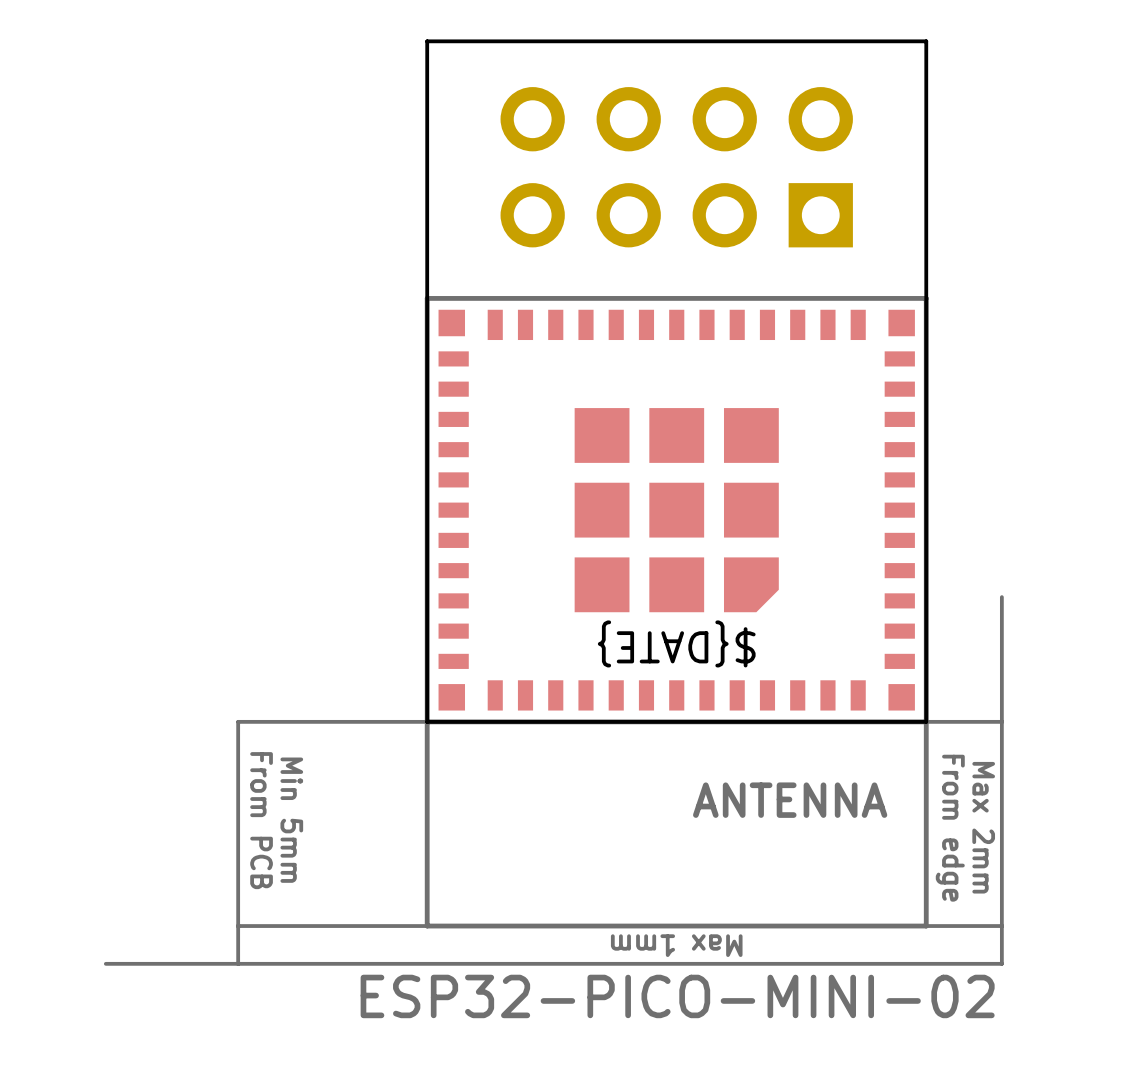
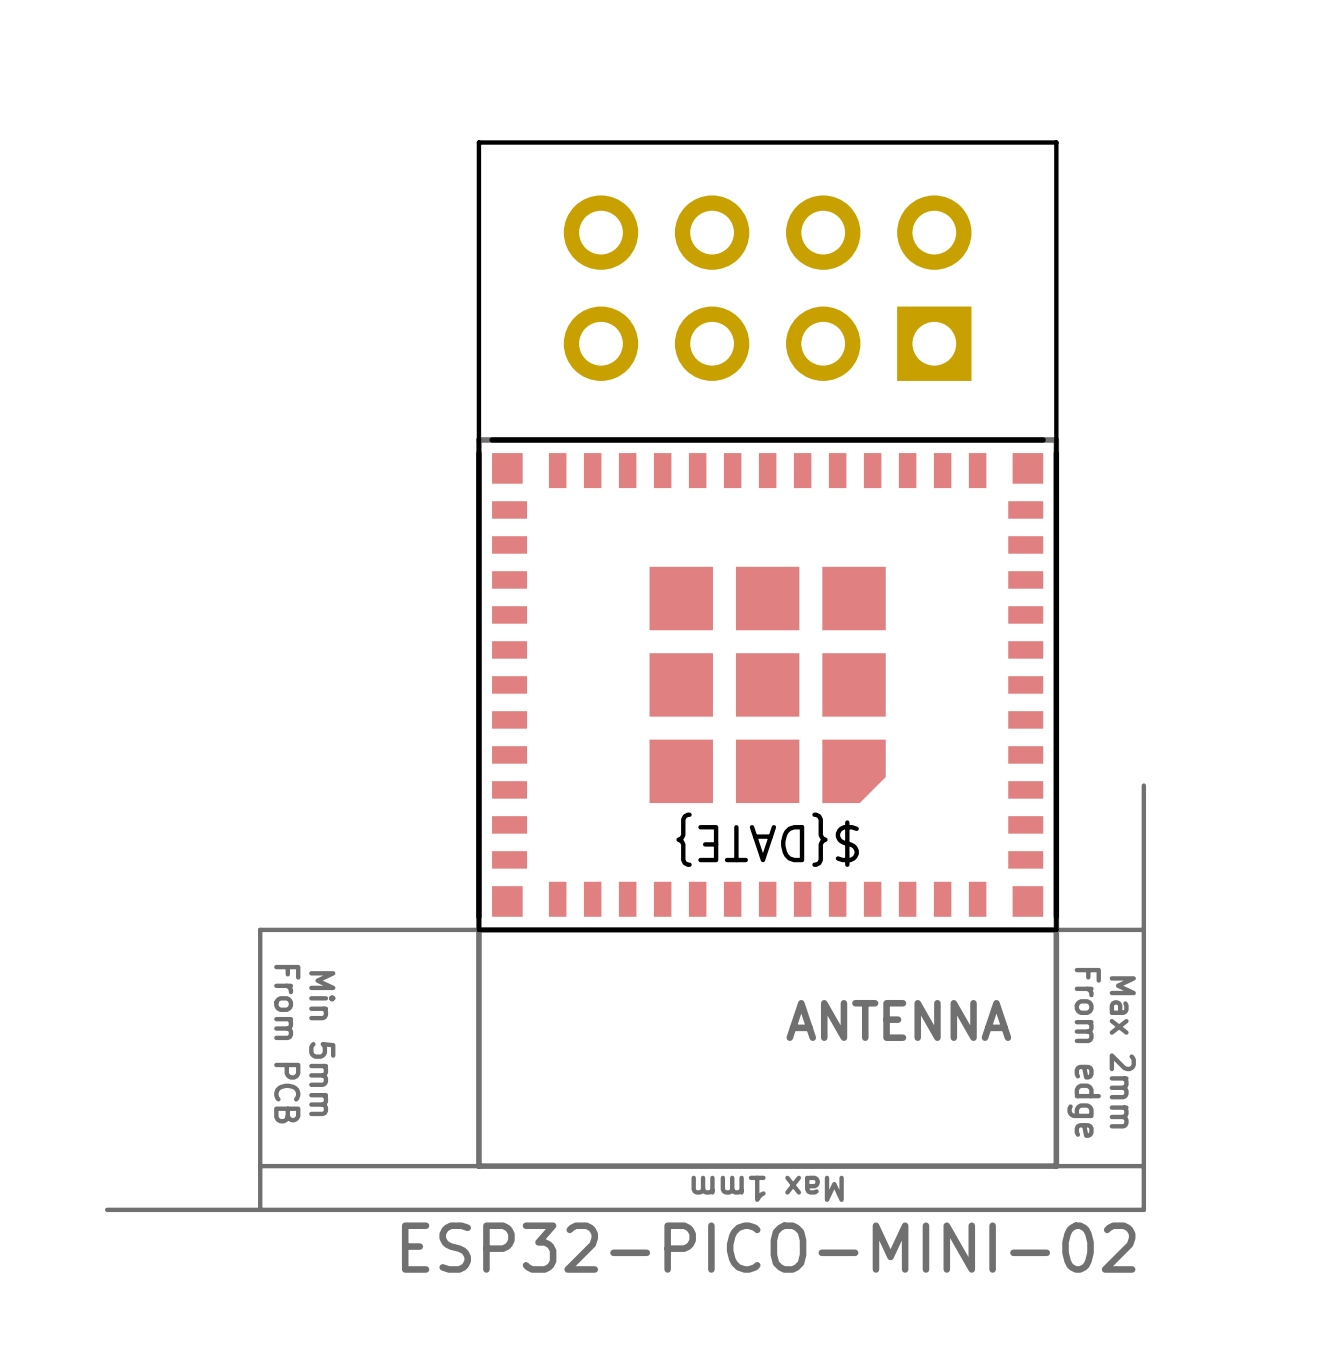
part footprint: [103, 296, 1004, 966] -> [104, 437, 1147, 1213]

